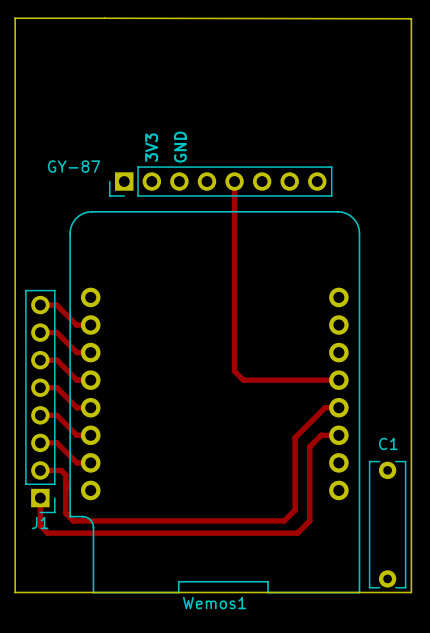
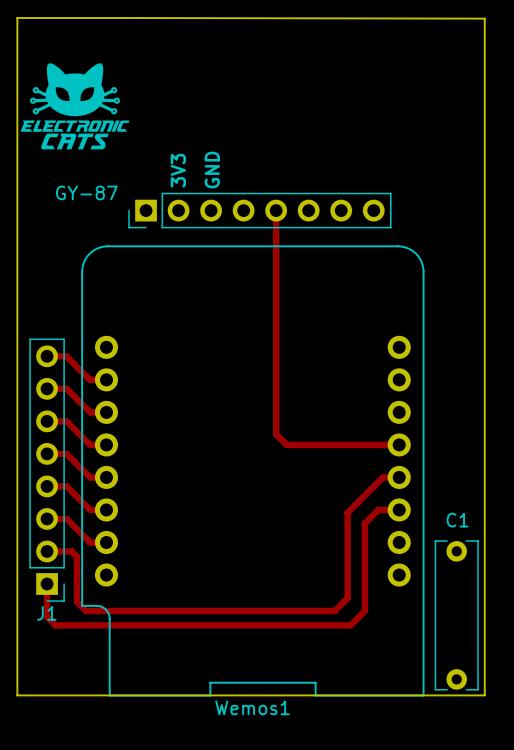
drawing: none -> [20, 63, 130, 150]

